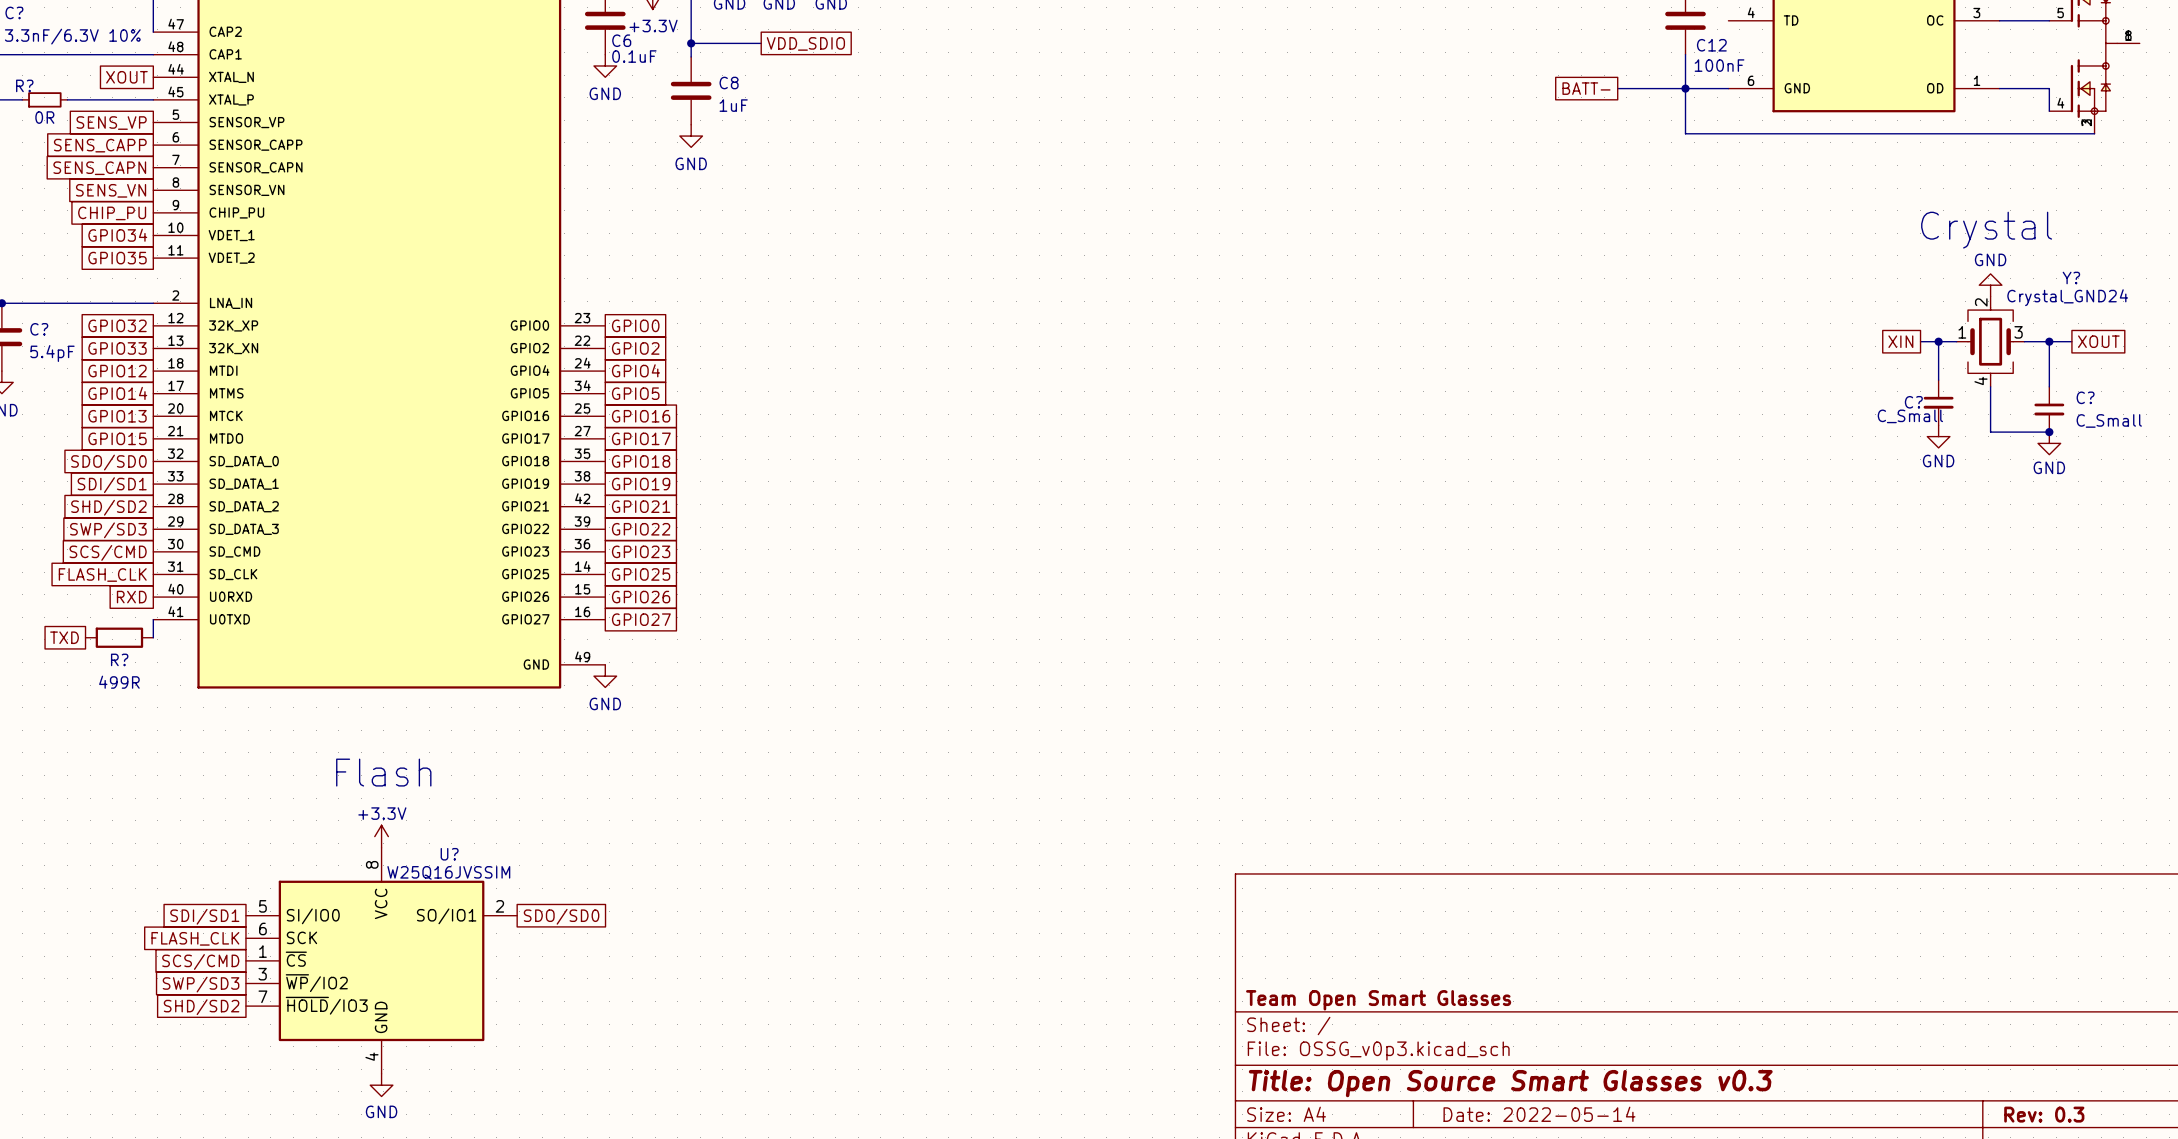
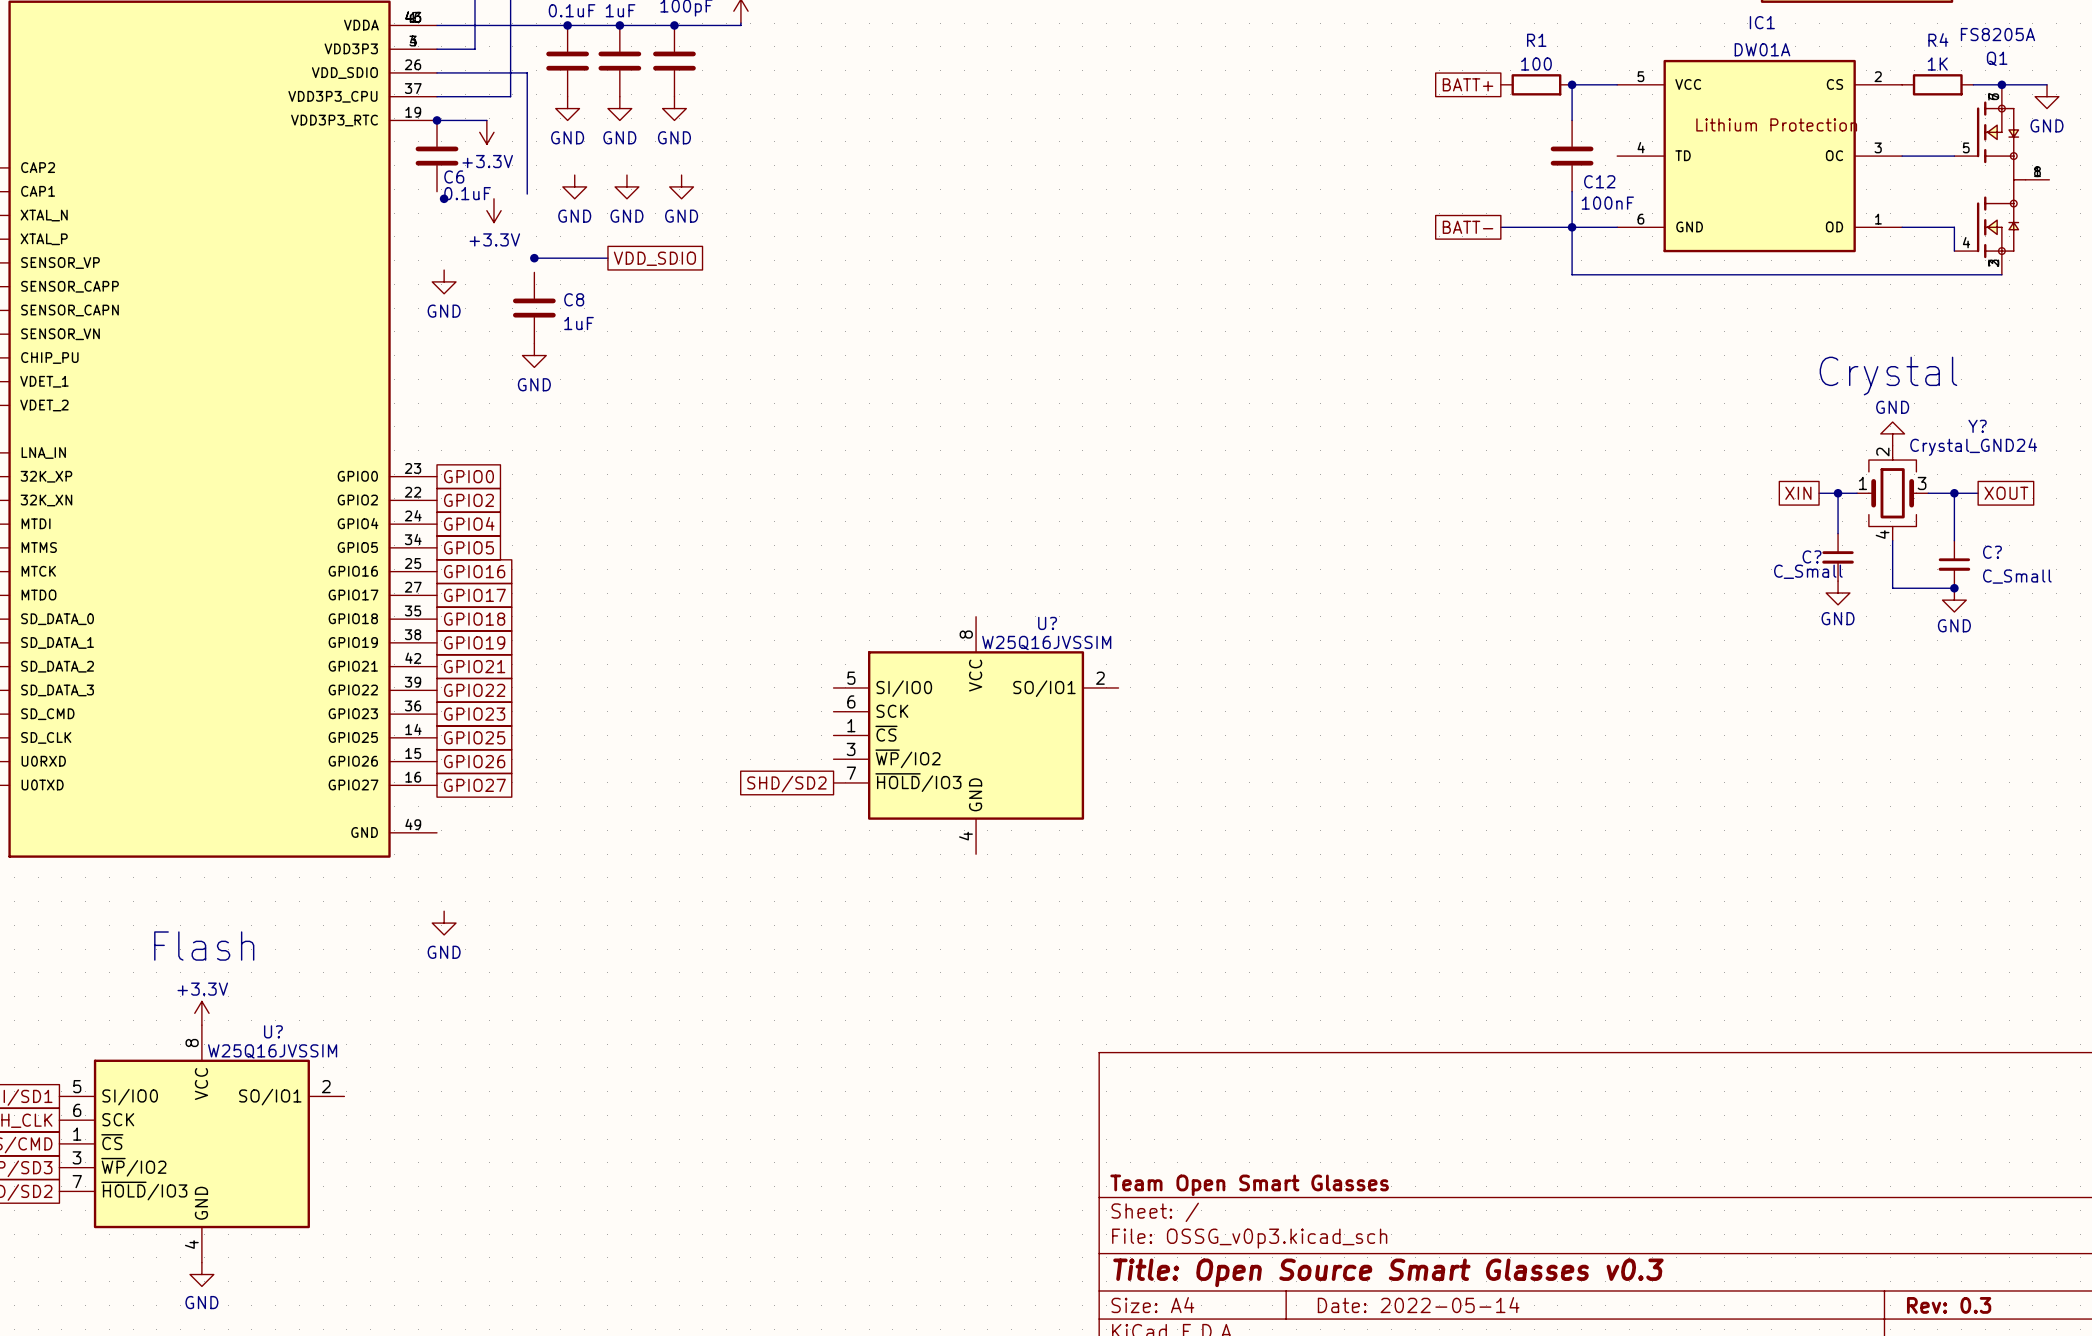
wire: (691, 43) (761, 43) -> (534, 258) (607, 258)
junction: (691, 43) -> none
global label position: VDD_SDIO (805, 43) -> VDD_SDIO (654, 258)
power symbol: none -> GND (574, 186)
power symbol: none -> GND (626, 186)
power symbol: none -> GND (681, 186)
junction: none -> (444, 198)
power symbol: GND (605, 65) -> none
power symbol: none -> +3.3V (493, 210)
C8 position: (691, 90) -> (534, 308)
junction: none -> (534, 258)
power symbol: GND (691, 136) -> none
power symbol: none -> GND (444, 281)
power symbol: none -> GND (534, 355)
U?: none -> W25Q16JVSSIM (976, 735)
global label: none -> SHD/SD2 (786, 784)
power symbol position: GND (605, 676) -> GND (444, 923)
global label: SDO/SD0 (561, 916) -> none

